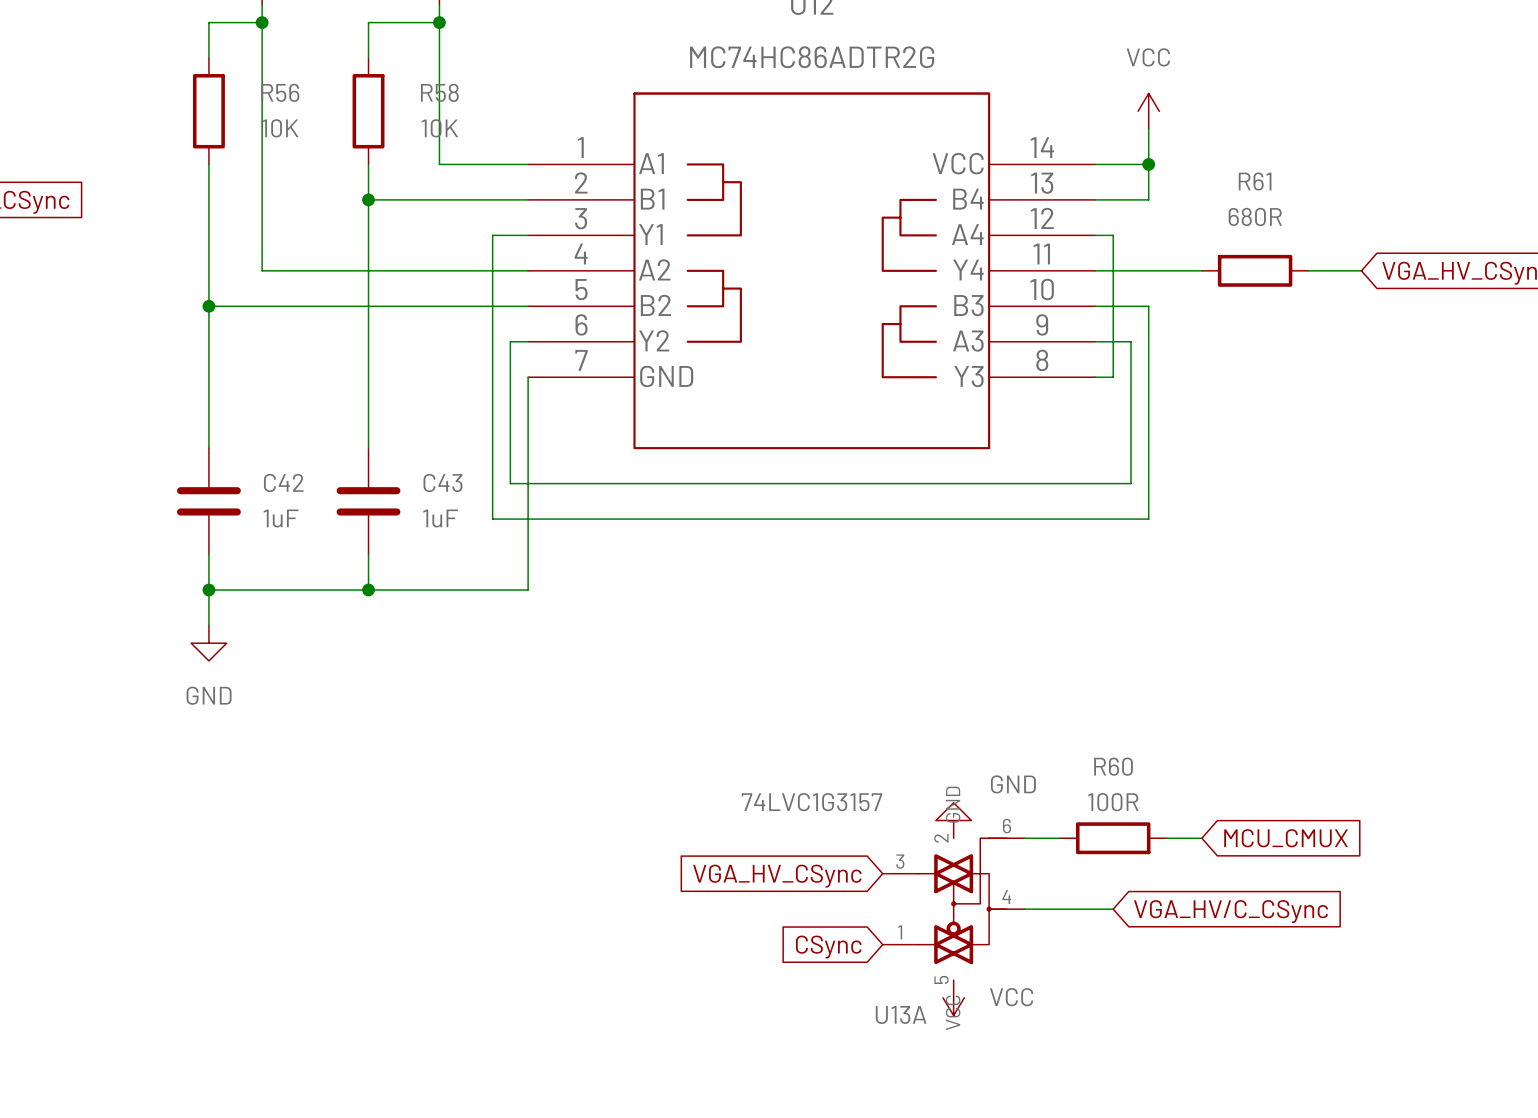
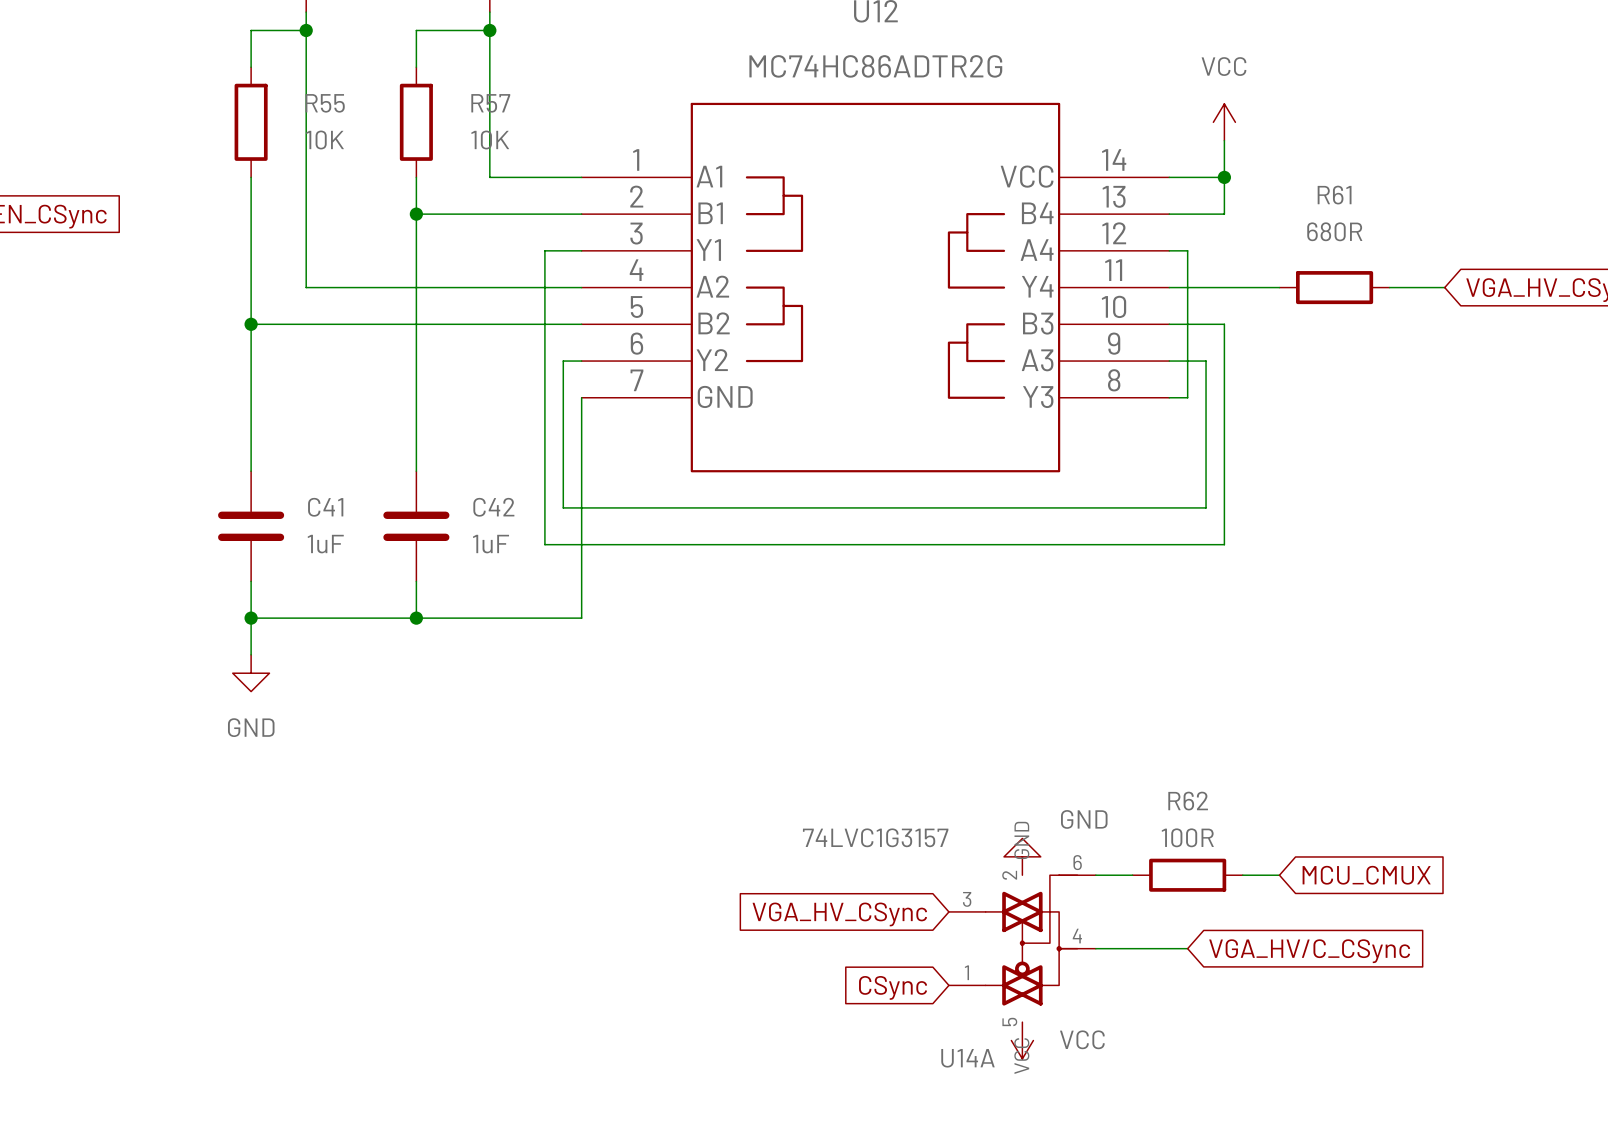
R56 name: R56 (280, 92) -> R55 (325, 103)
R58 name: R58 (439, 92) -> R57 (490, 103)
C42 name: C42 (283, 482) -> C41 (325, 507)
C43 name: C43 (442, 482) -> C42 (493, 507)
R60 name: R60 (1113, 766) -> R62 (1188, 801)
U13A name: U13A (901, 1014) -> U14A (967, 1058)

